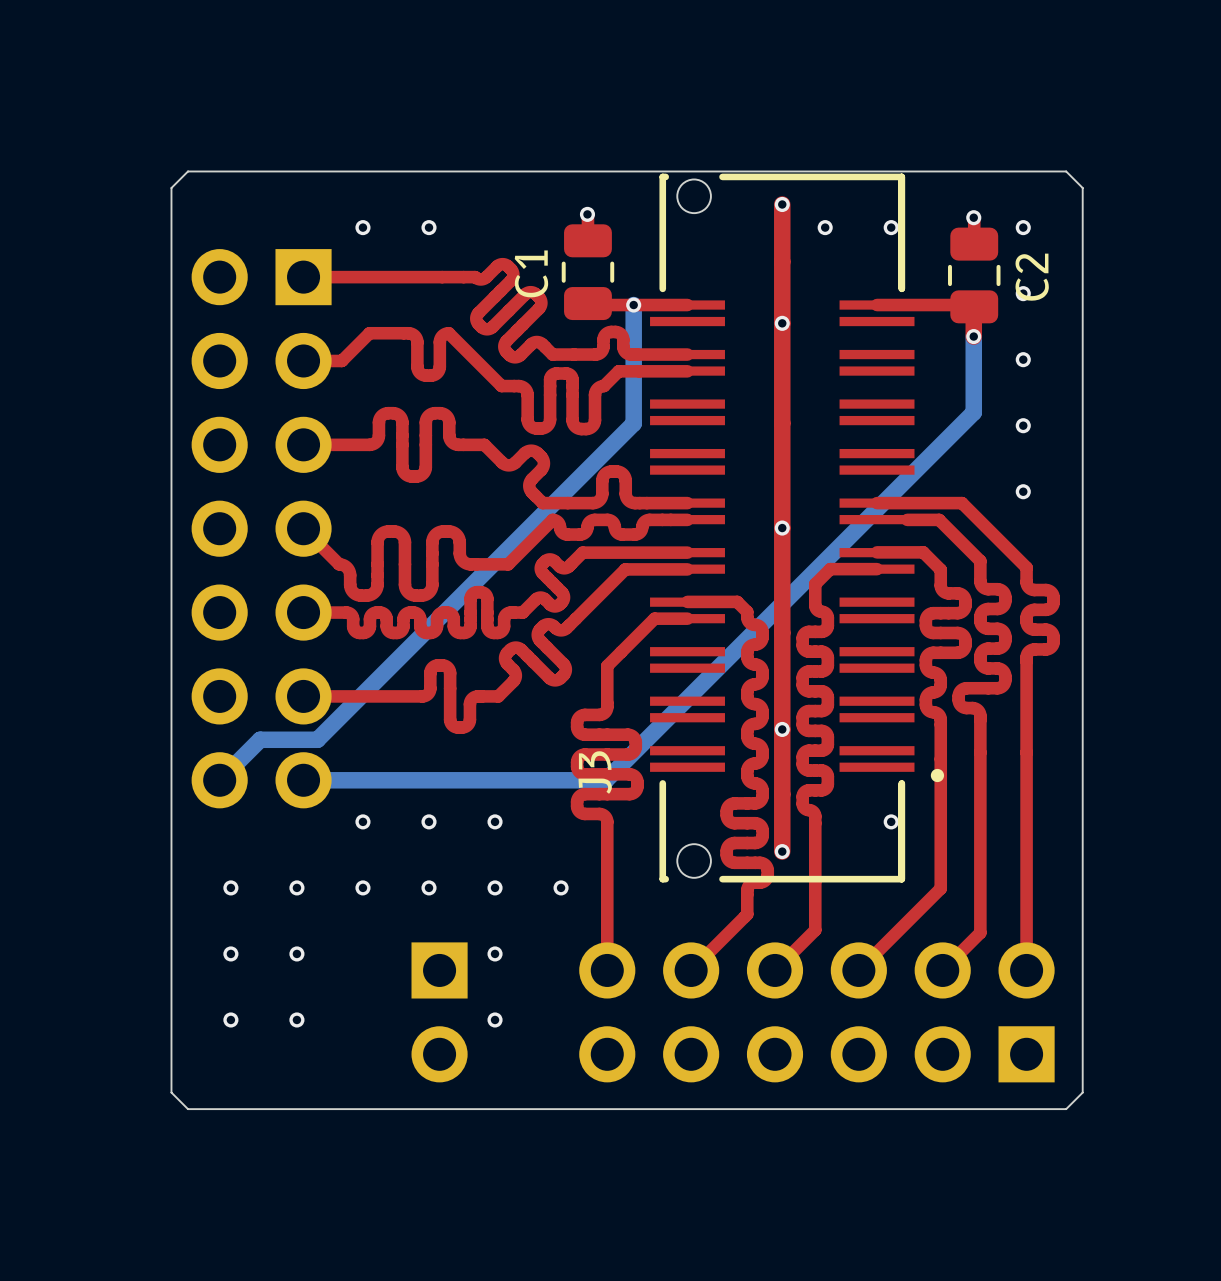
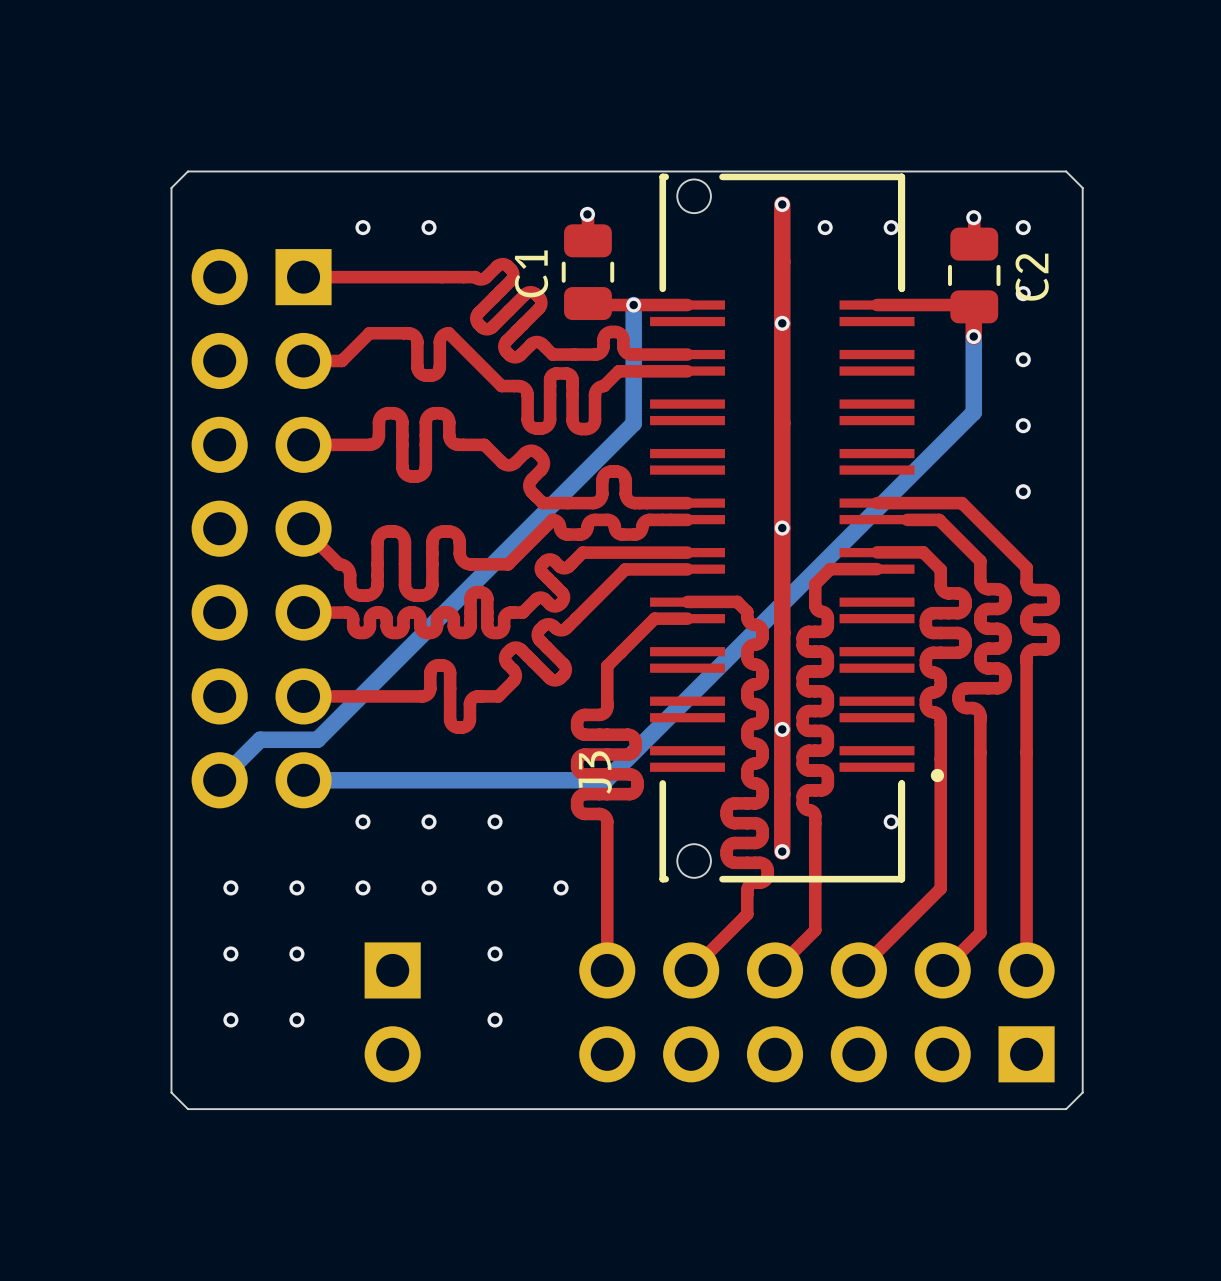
part position: (439, 1012) -> (392, 1012)

